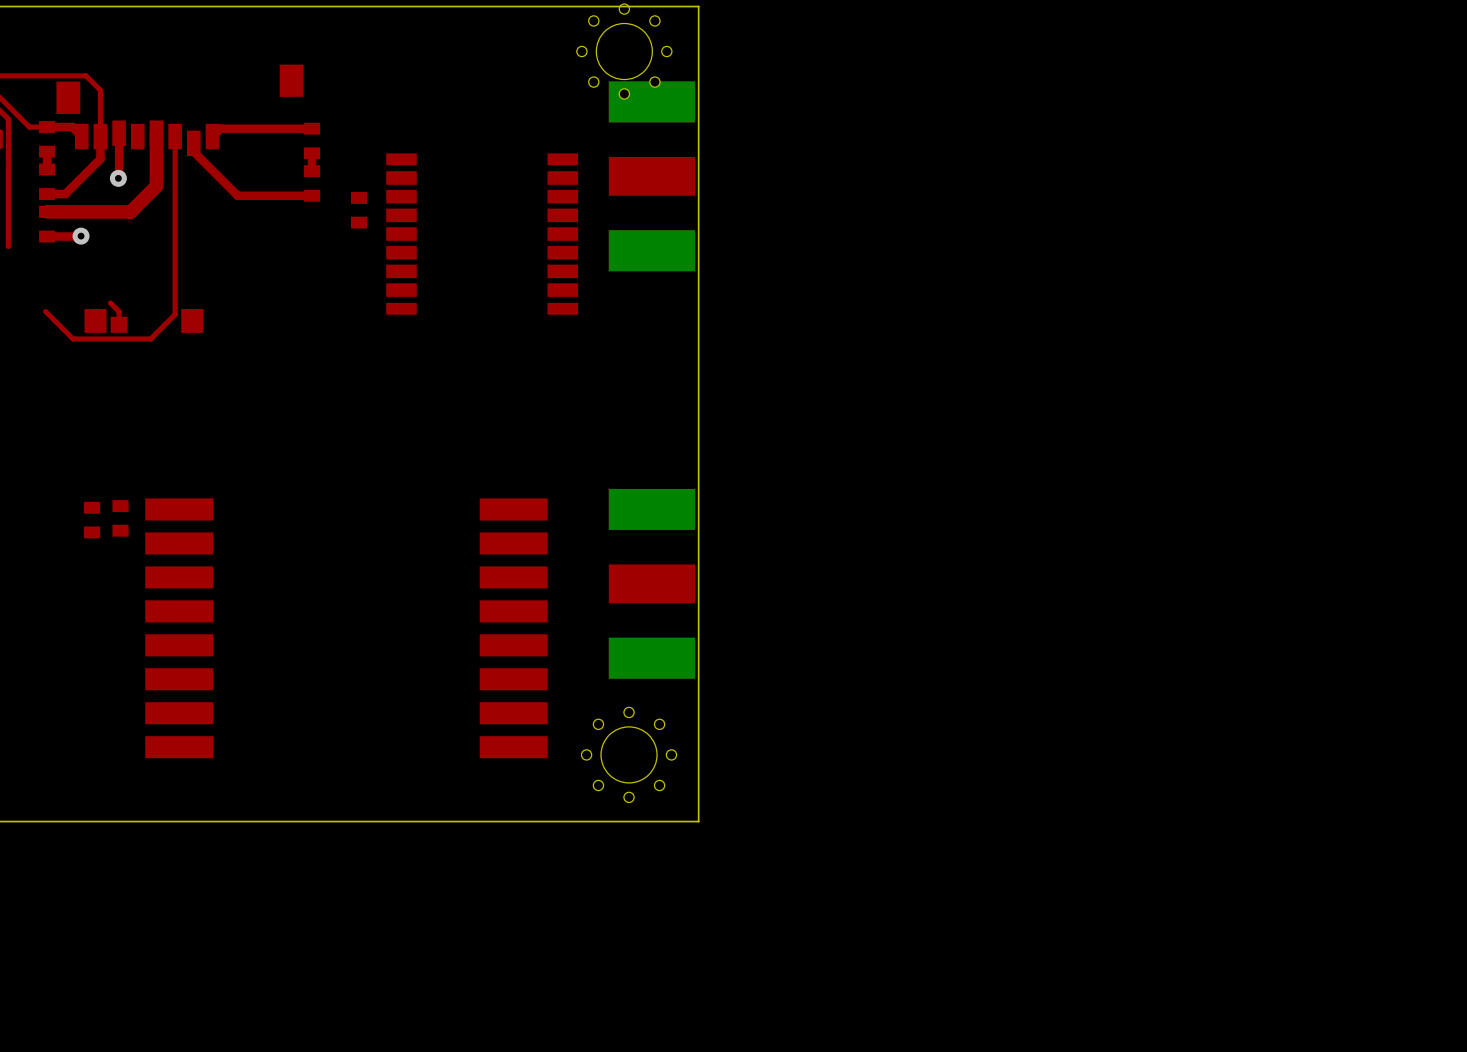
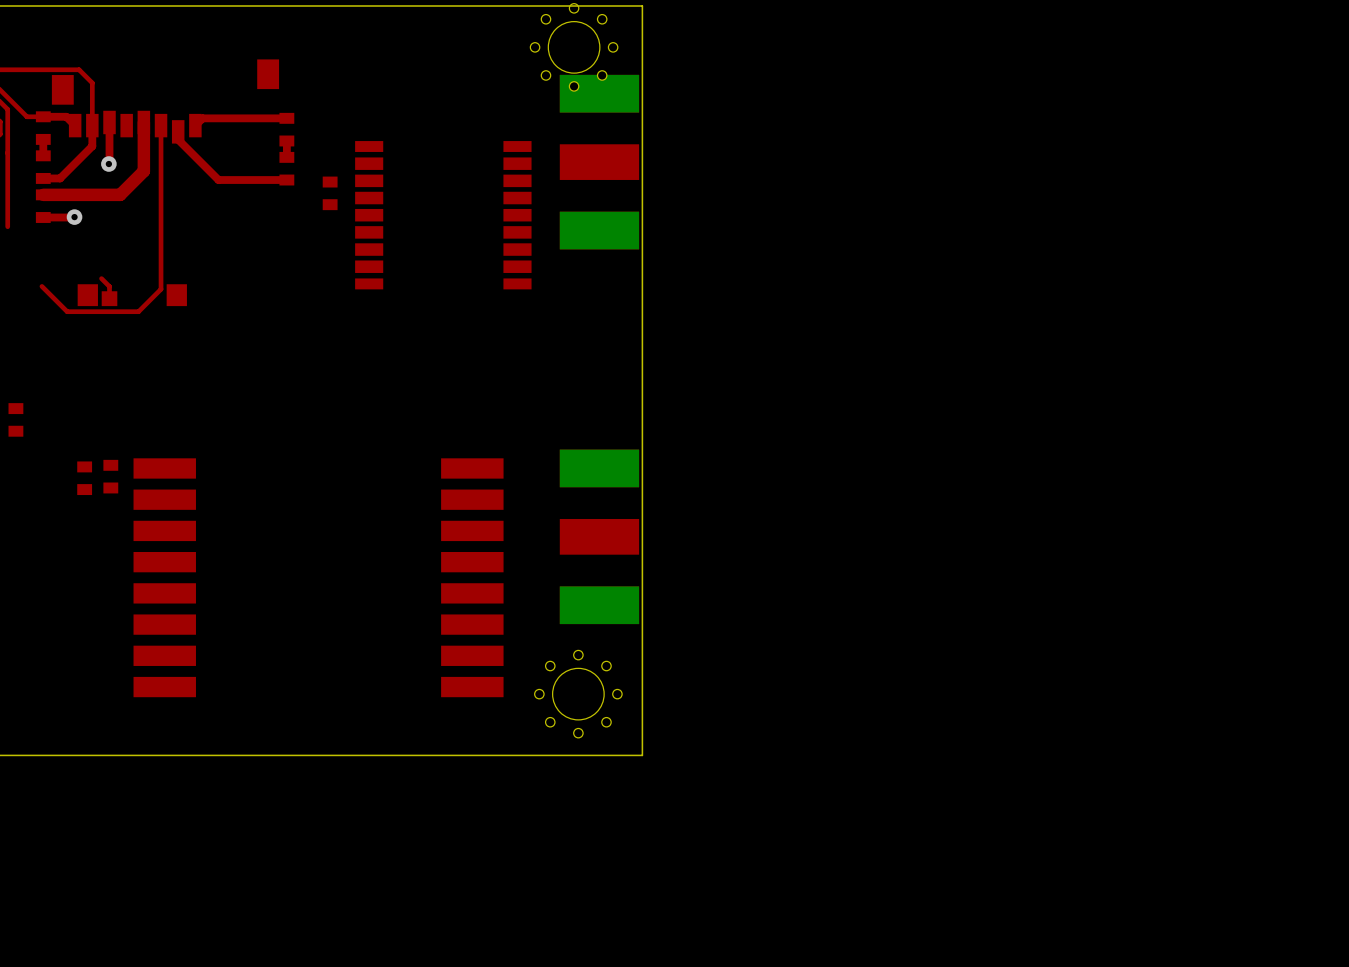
part: none -> (15, 419)

